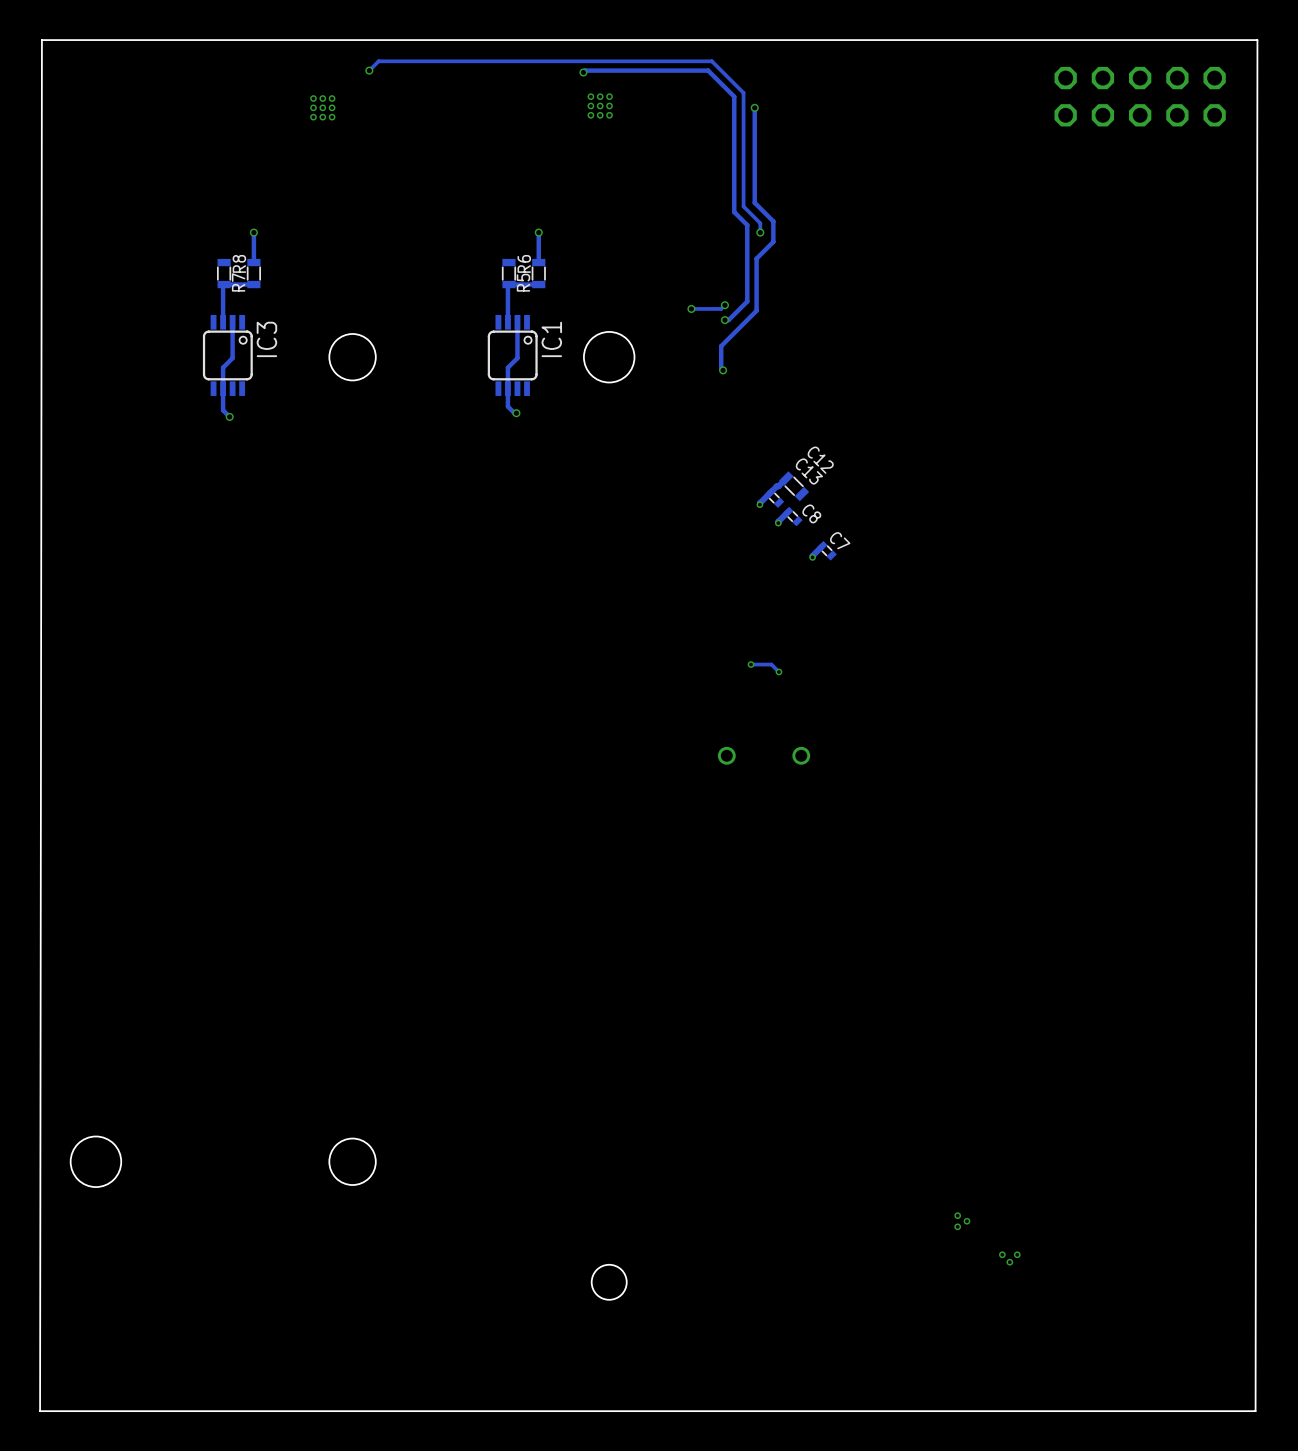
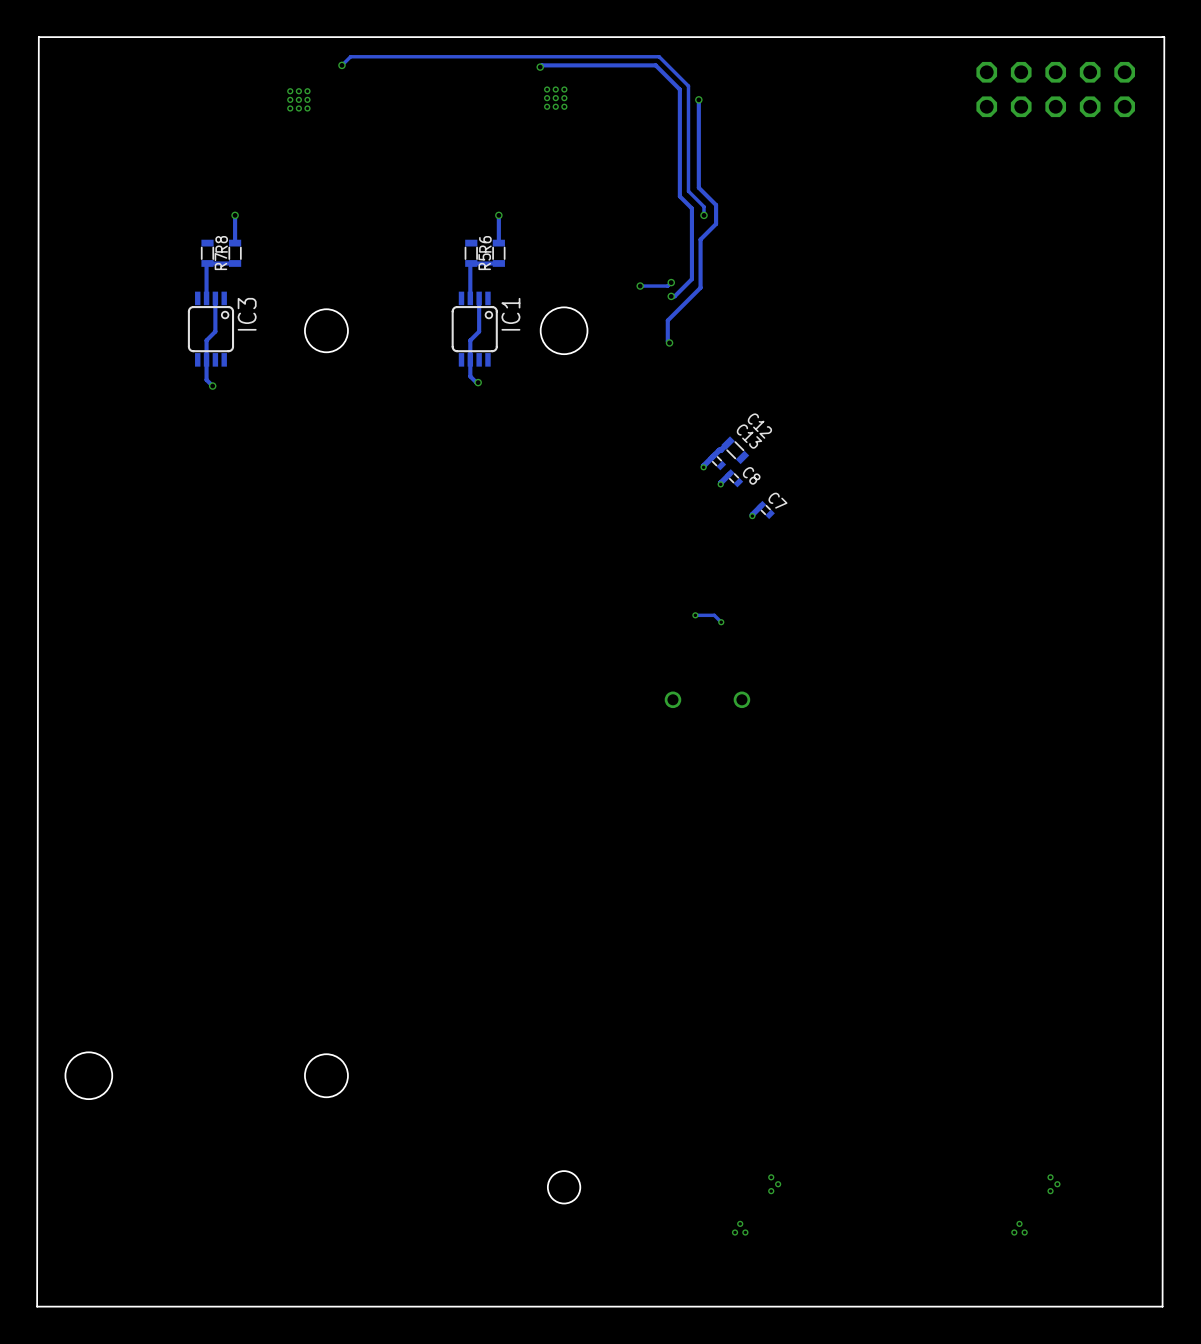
via: (957, 1215) -> none
via: (966, 1221) -> none
via: (957, 1226) -> none
via: (1002, 1254) -> none
via: (1017, 1254) -> none
via: (1009, 1262) -> none
via: none -> (771, 1177)
via: none -> (1050, 1177)
via: none -> (778, 1184)
via: none -> (1057, 1184)
via: none -> (771, 1191)
via: none -> (1050, 1191)
via: none -> (740, 1223)
via: none -> (1019, 1223)
via: none -> (735, 1232)
via: none -> (745, 1232)
via: none -> (1014, 1232)
via: none -> (1024, 1232)

